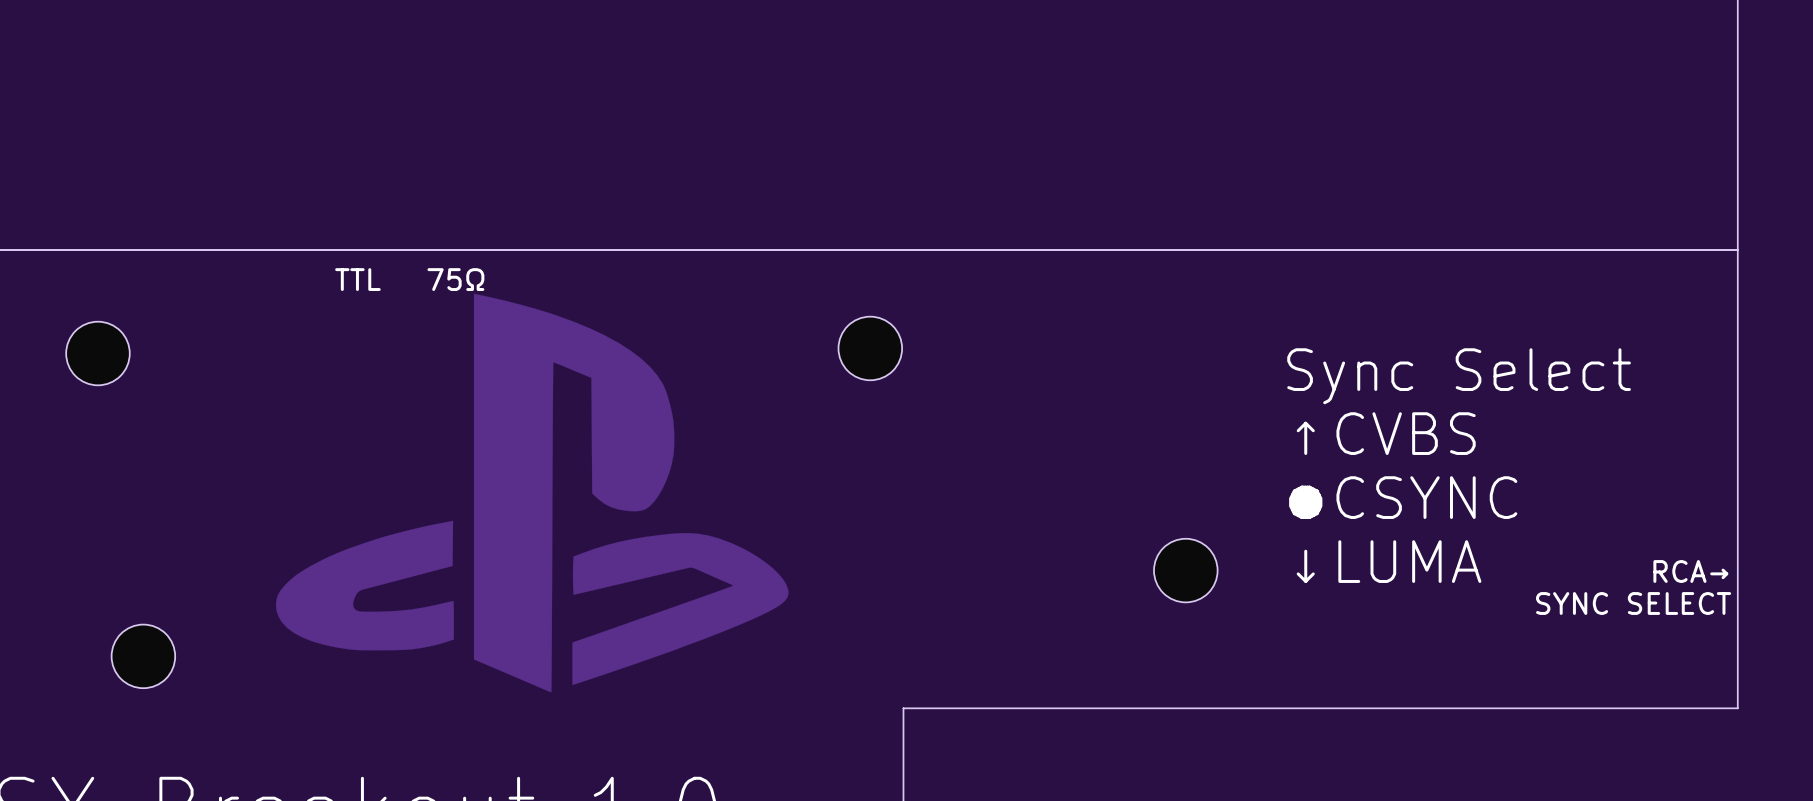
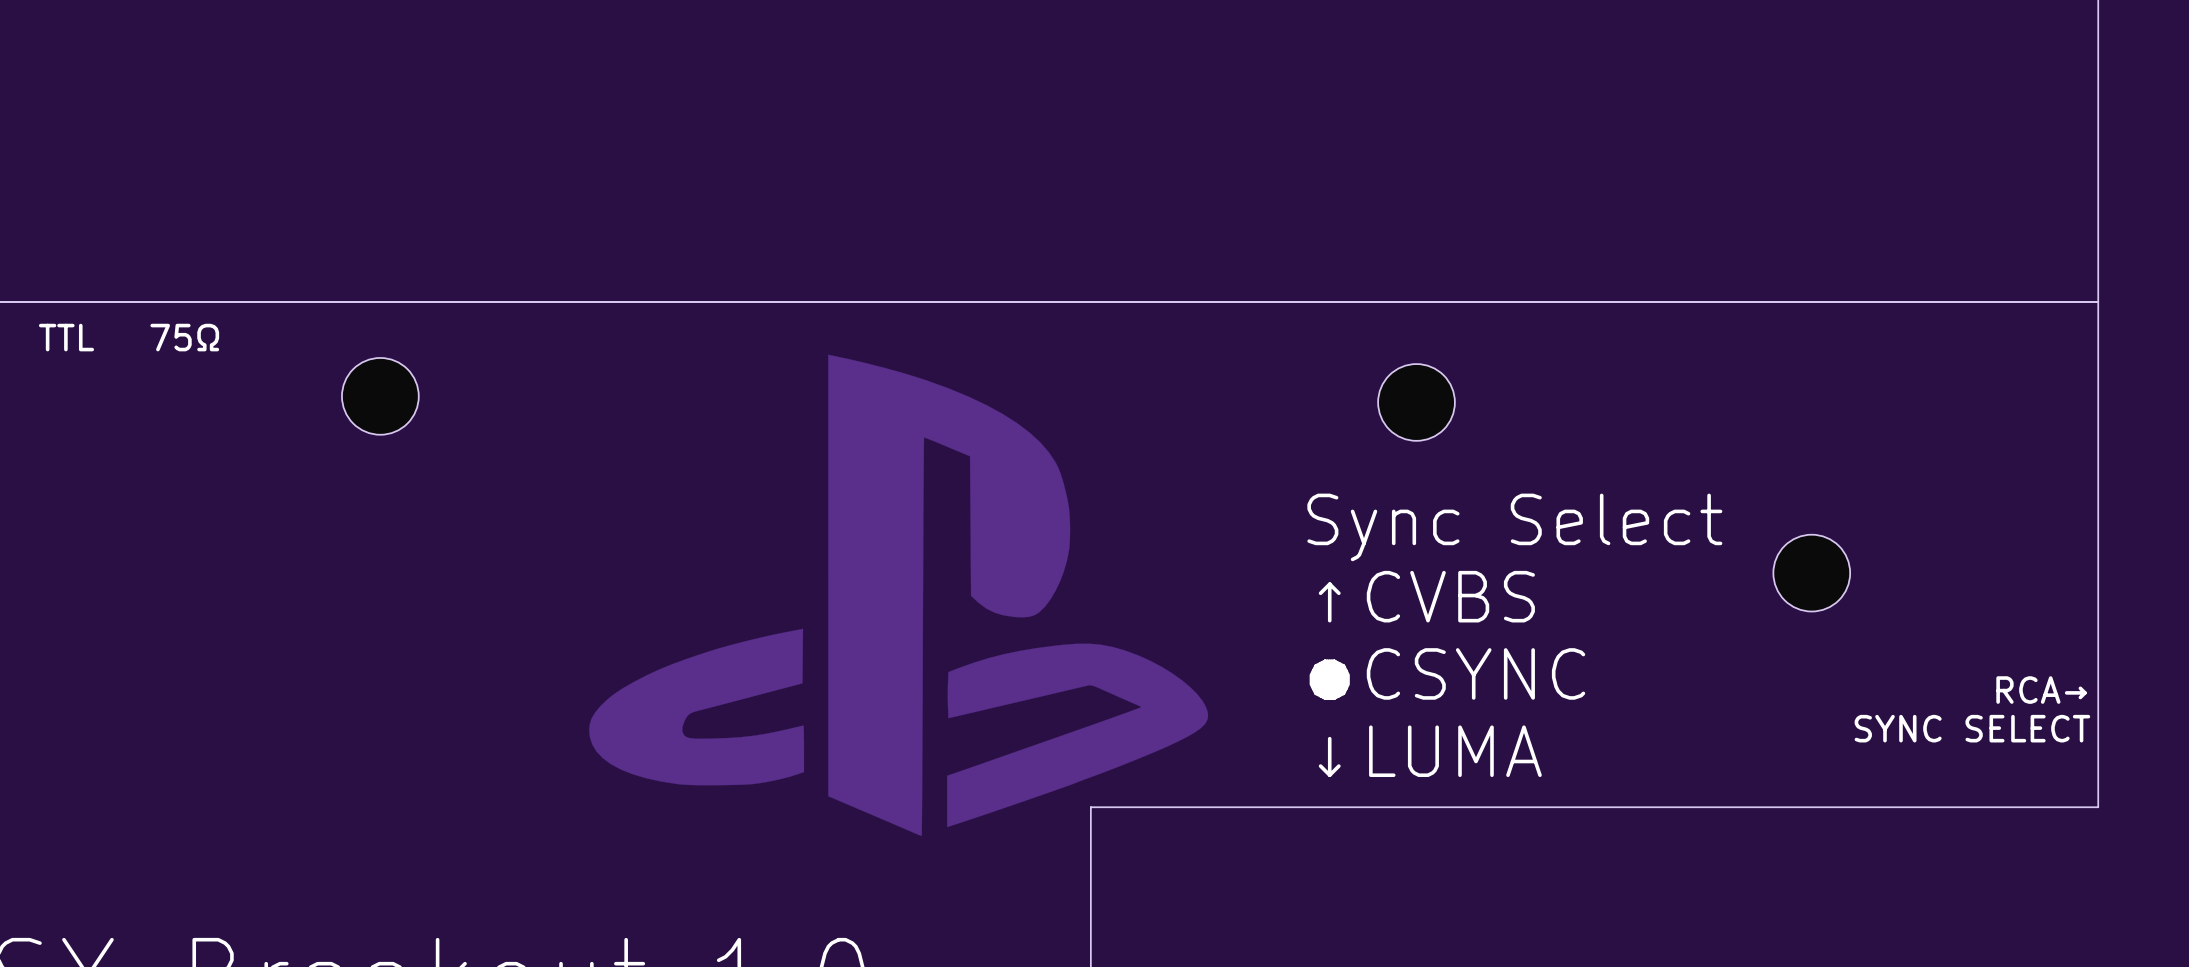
text position: TTL (357, 279) -> TTL (66, 337)
text position: 75Ω (455, 279) -> 75Ω (184, 337)
part: none -> (380, 396)
part: none -> (1416, 402)
part: (870, 348) -> none
part: (97, 353) -> none
text position: Sync Select (1459, 376) -> Sync Select (1514, 527)
text position: ↑CVBS (1386, 433) -> ↑CVBS (1426, 596)
part: none -> (1811, 573)
drawing position: (532, 493) -> (898, 595)
text position: ●CSYNC (1403, 497) -> ●CSYNC (1447, 673)
text position: ↓LUMA (1389, 561) -> ↓LUMA (1430, 751)
part: (1185, 570) -> none
part: (143, 656) -> none
board edge: (1737, 668) (1737, 708) (903, 708) -> (2098, 807) (1090, 807) (1090, 855)

